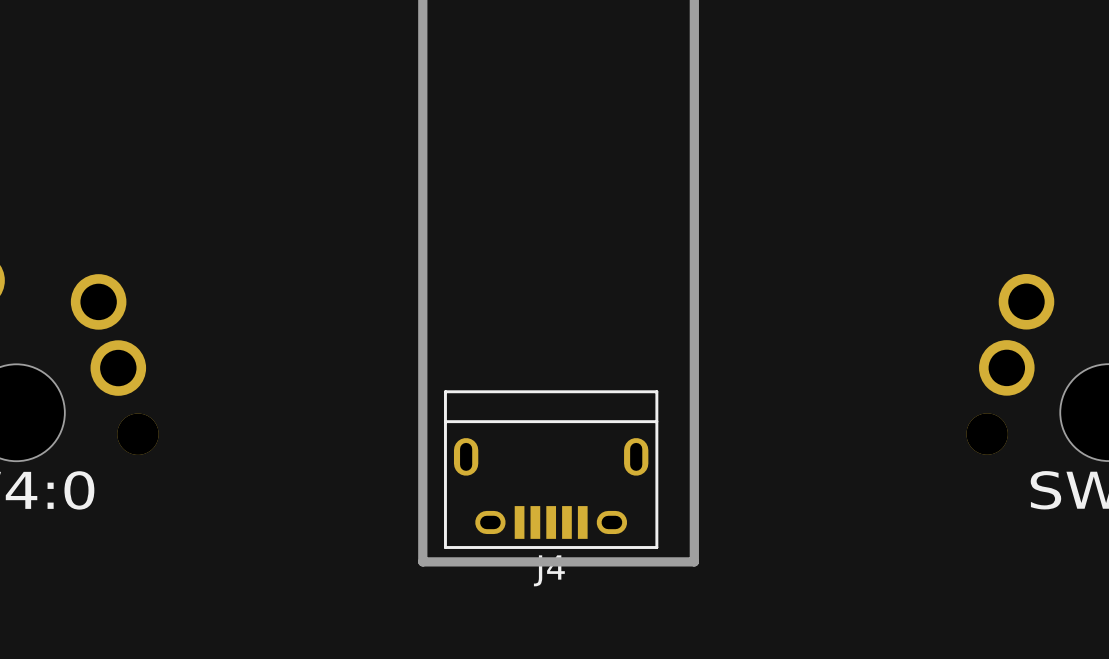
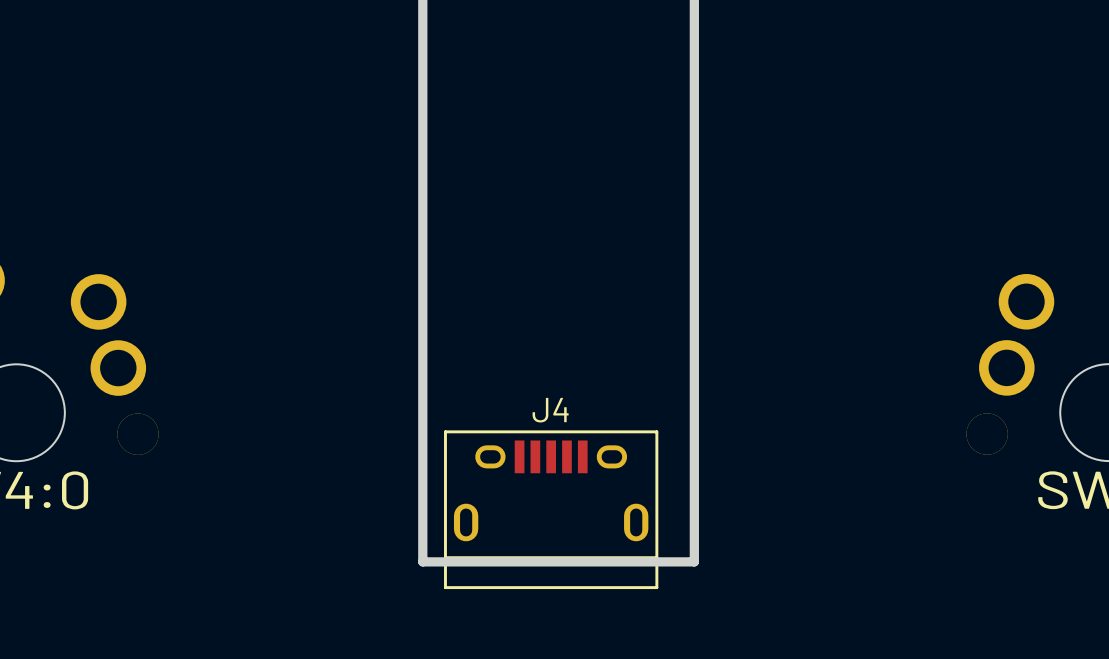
J4 rotation: 0° (551, 469) -> 180° (551, 509)

